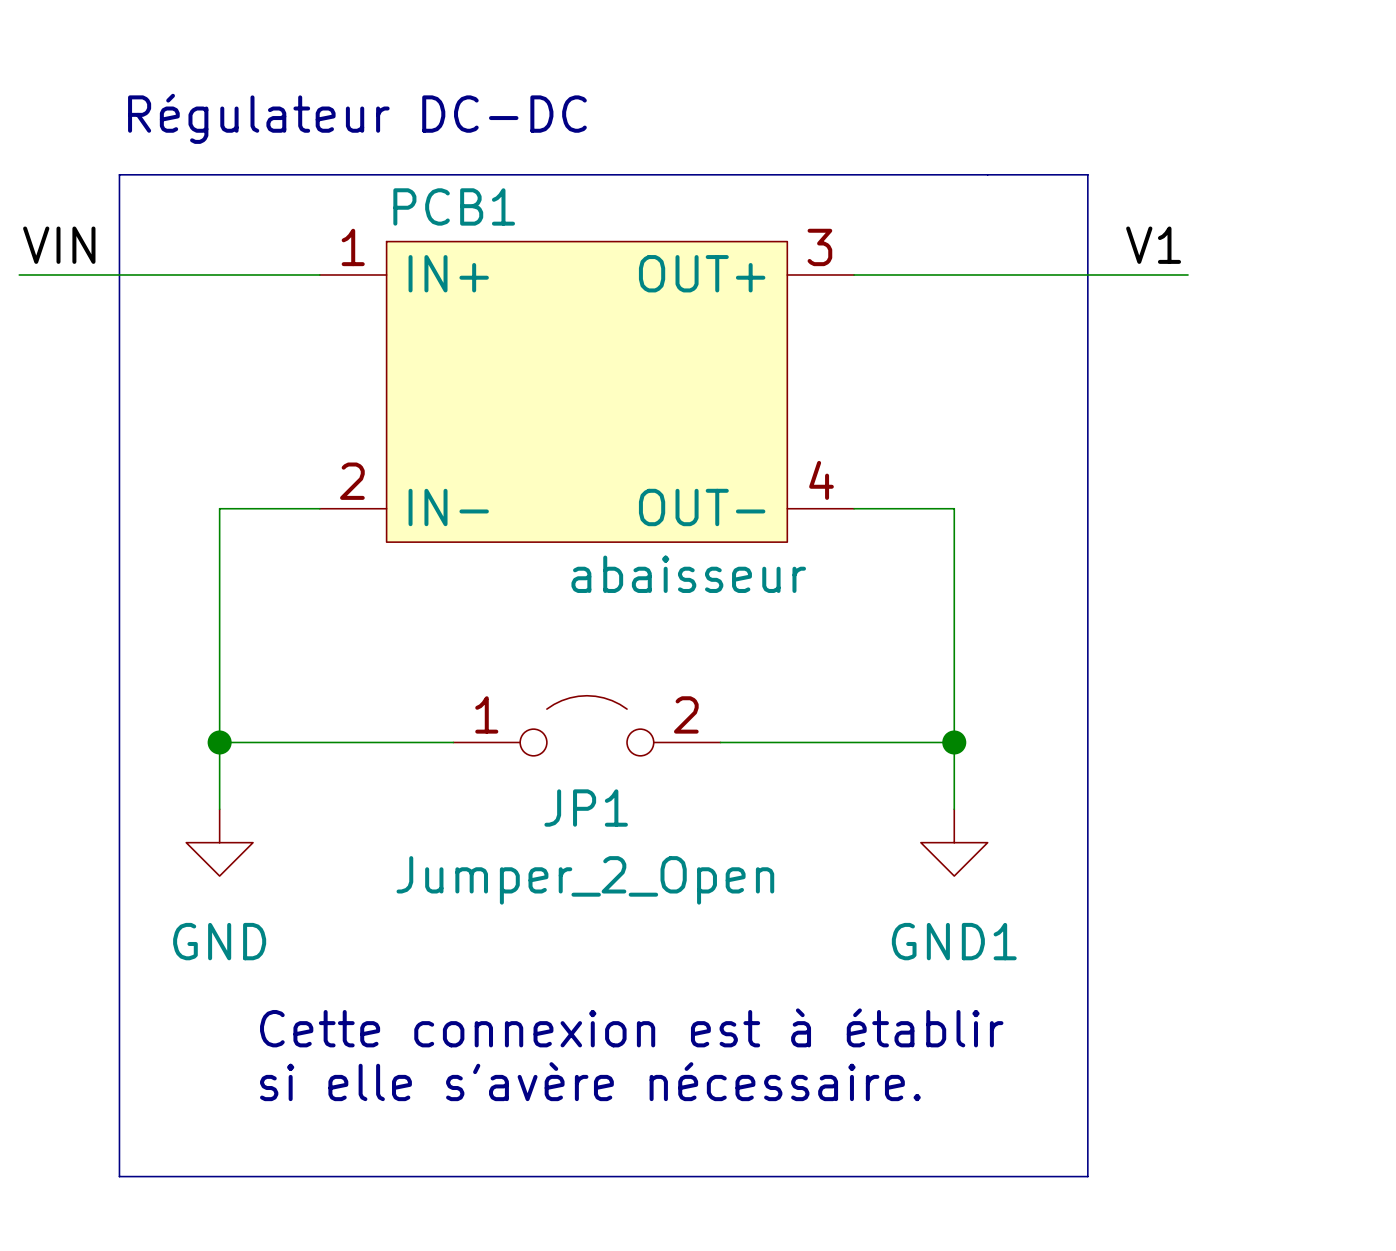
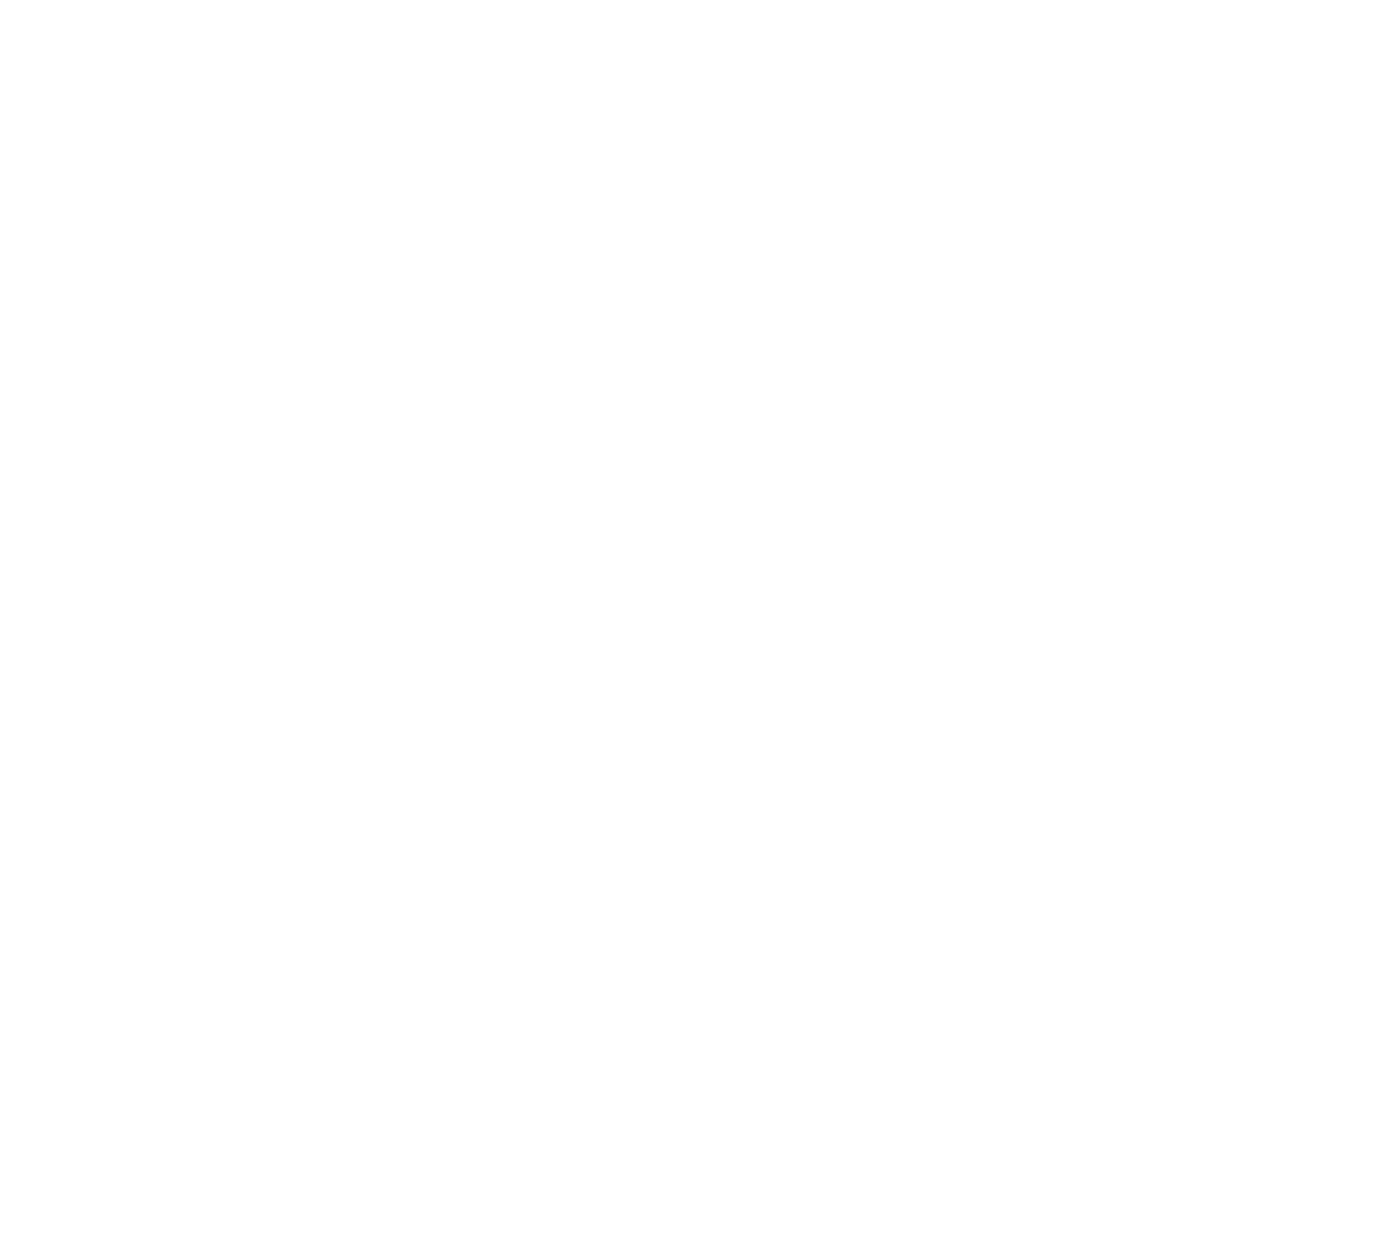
text: Régulateur DC-DC (357, 118) -> none
line: (119, 174) (1087, 174) (1087, 1176) (119, 1176) (119, 174) -> none
label: VIN (59, 245) -> none
label: V1 (1153, 245) -> none
wire: (19, 274) (319, 274) -> none
wire: (854, 274) (1188, 274) -> none
PCB1: abaisseur (820, 308) -> none
wire: (319, 508) (219, 508) (219, 809) -> none
wire: (854, 508) (954, 508) (954, 809) -> none
JP1: Jumper_2_Open (586, 725) -> none
wire: (219, 742) (453, 742) -> none
junction: (219, 742) -> none
wire: (720, 742) (954, 742) -> none
junction: (954, 742) -> none
power symbol: GND (219, 842) -> none
power symbol: GND1 (954, 842) -> none
text: Cette connexion est à établir (631, 1027) -> none
text: si elle s'avère nécessaire. (590, 1081) -> none

